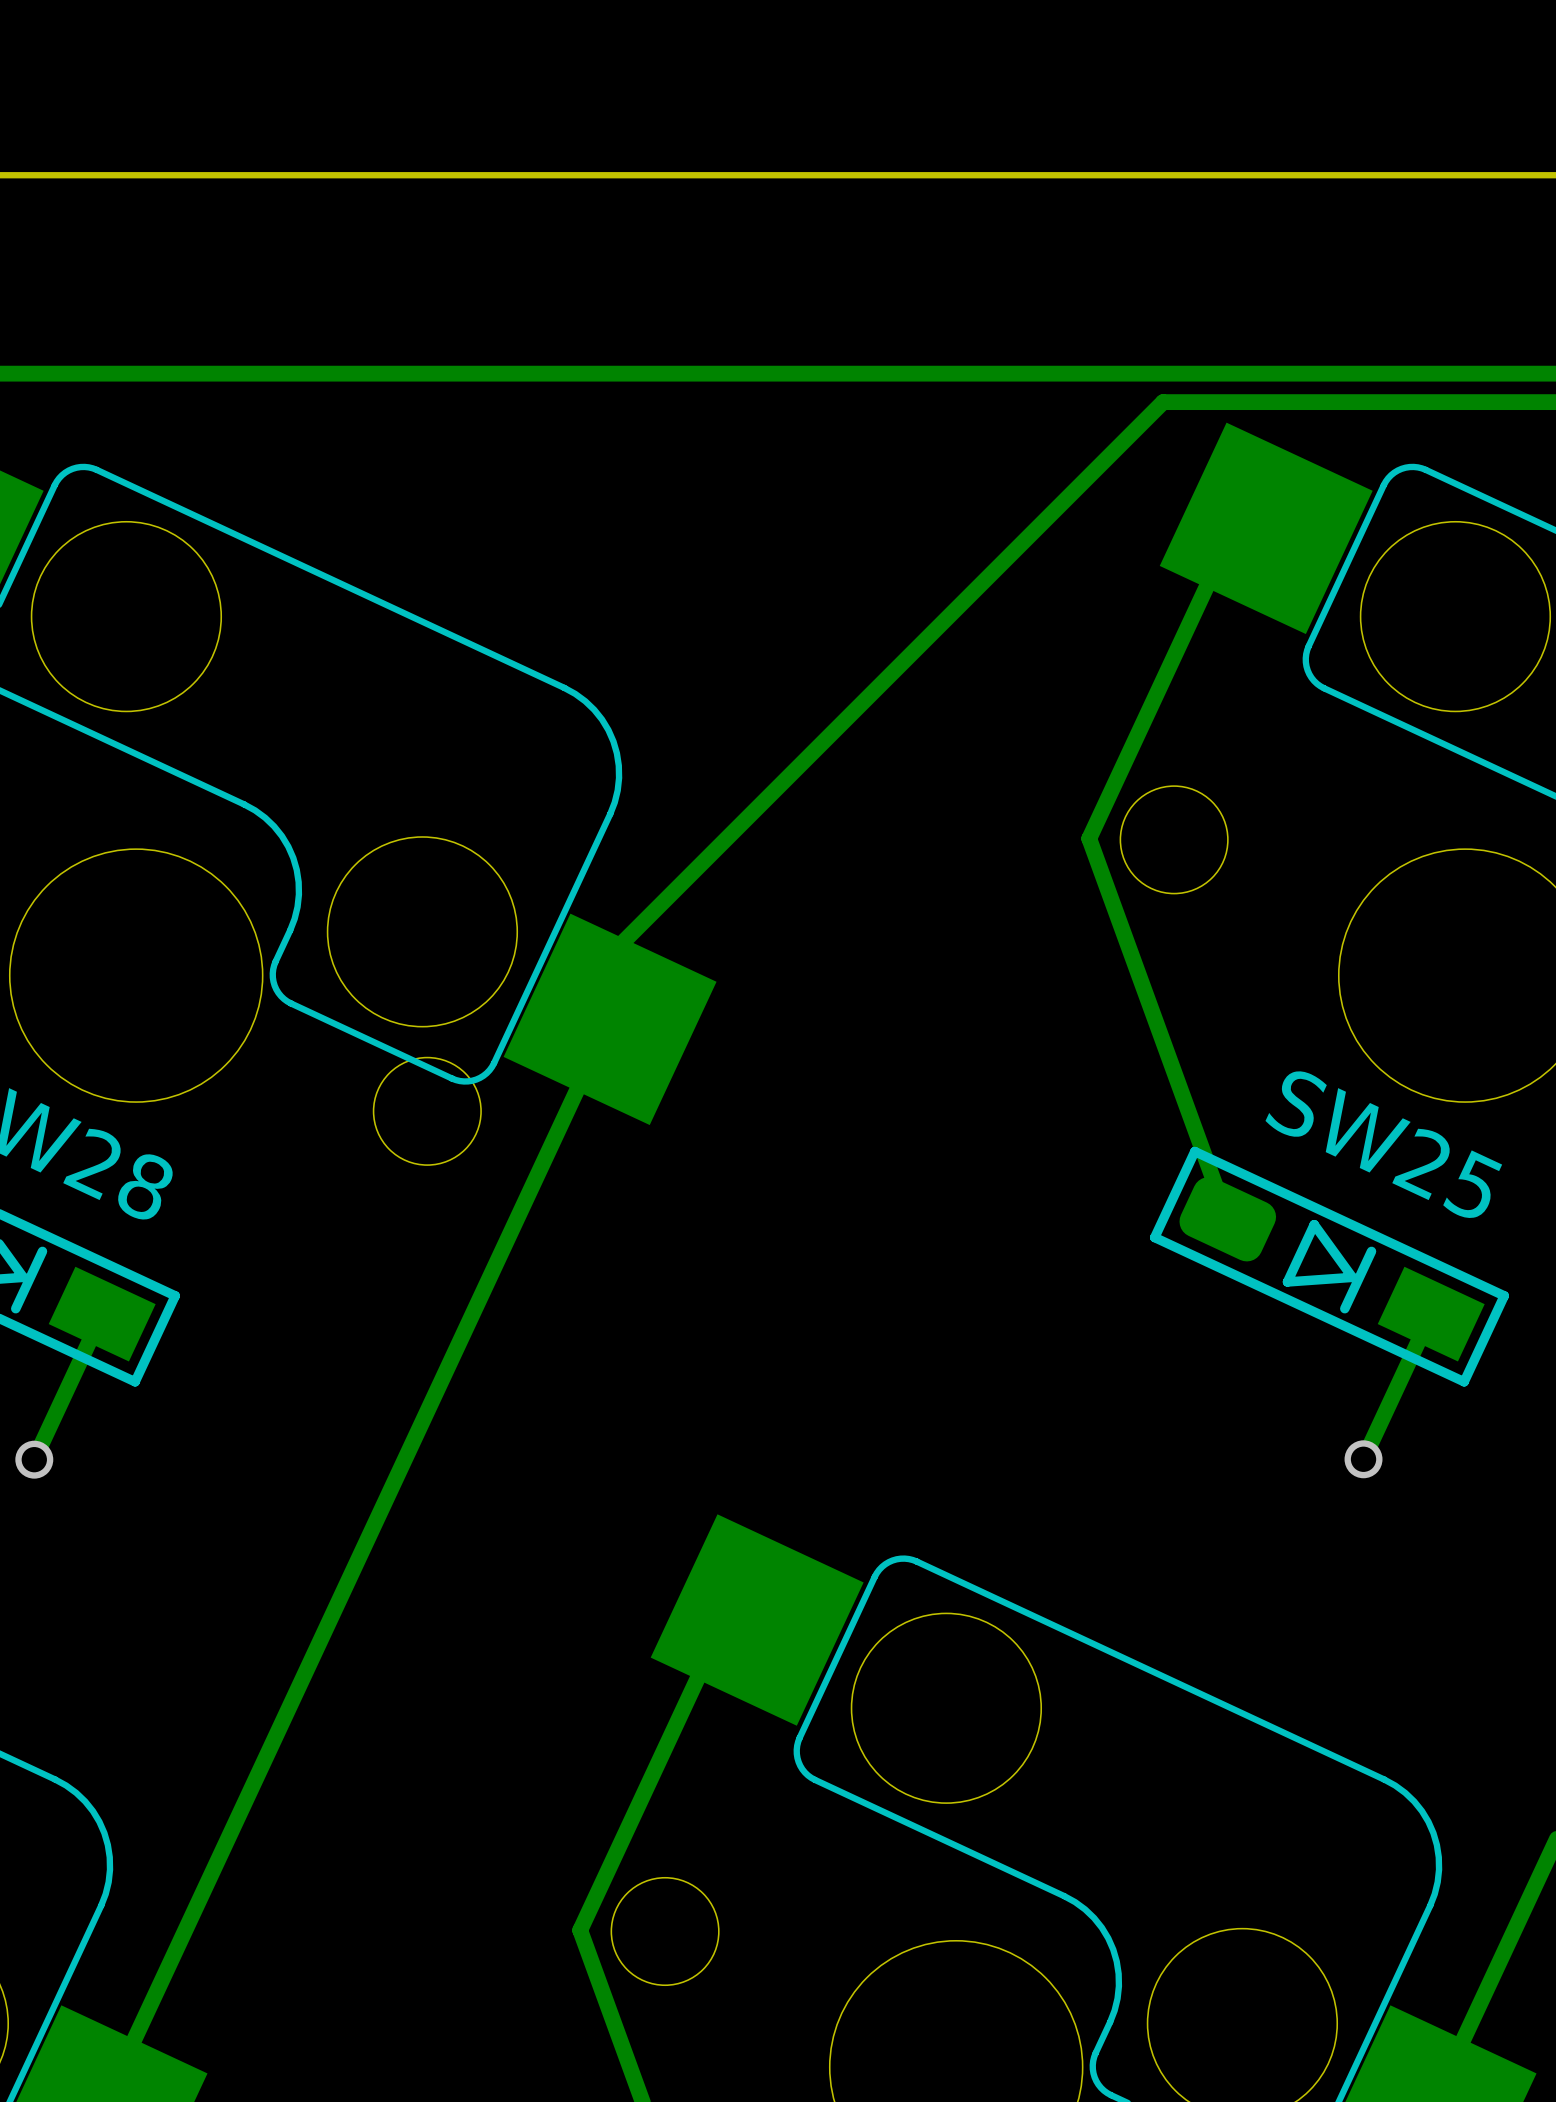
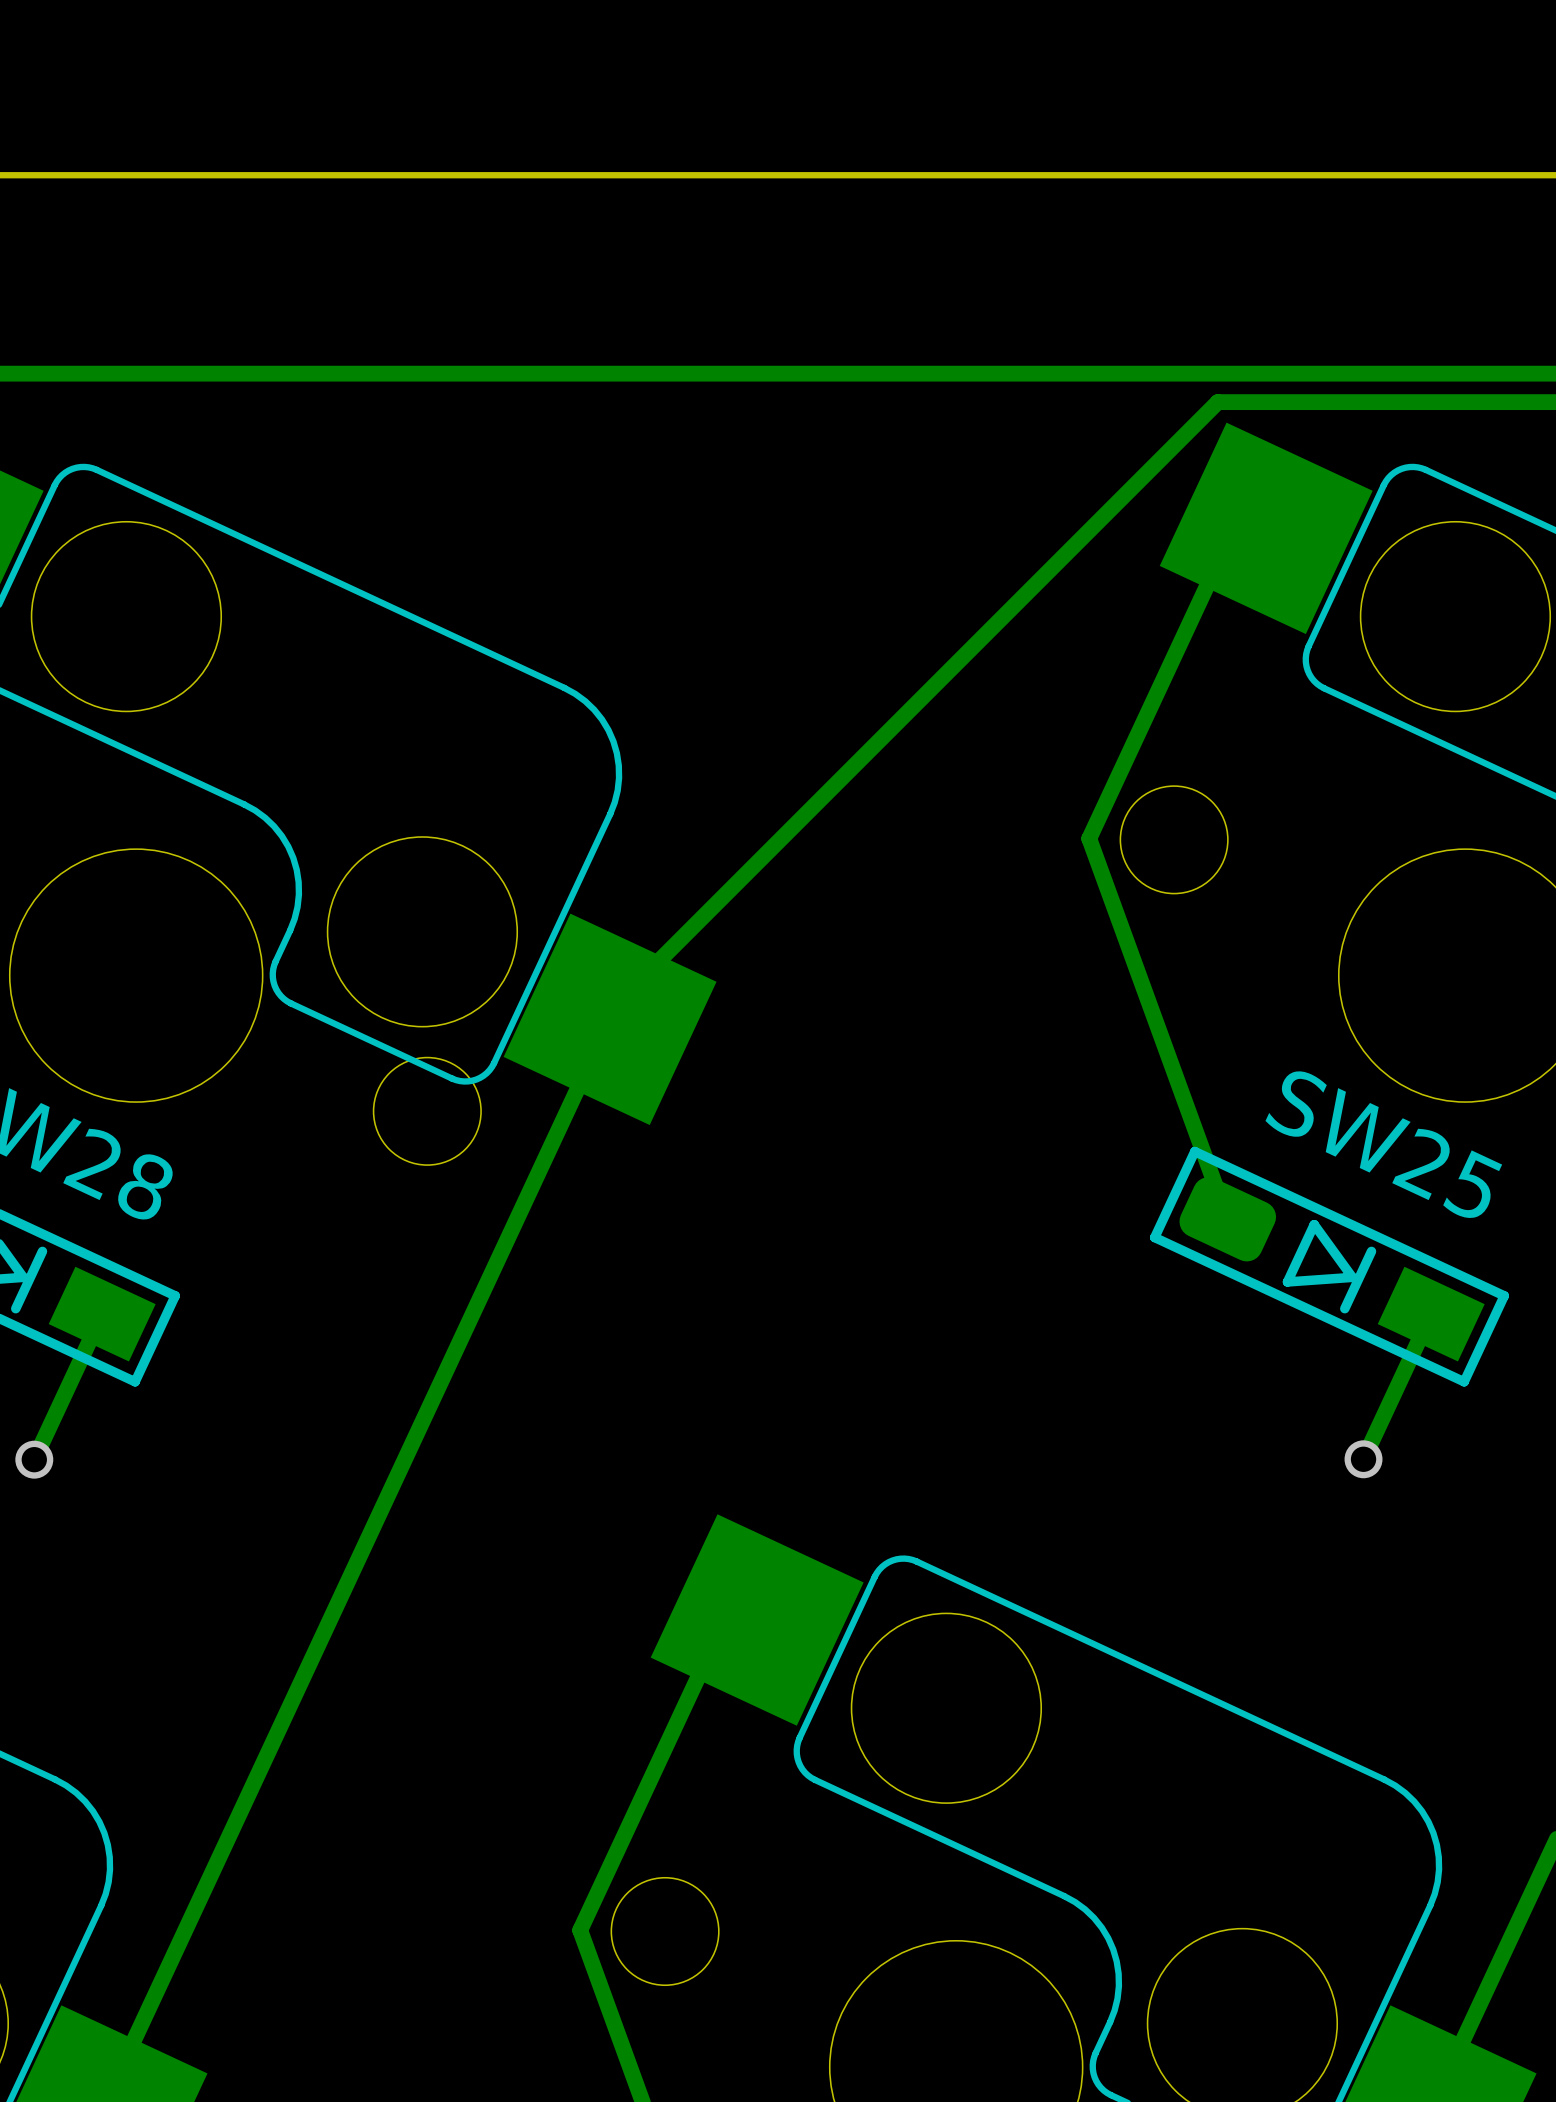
track: (1217, 402) (1163, 402) (610, 955) (610, 1019) -> (1217, 402) (610, 1009) (610, 1019)

